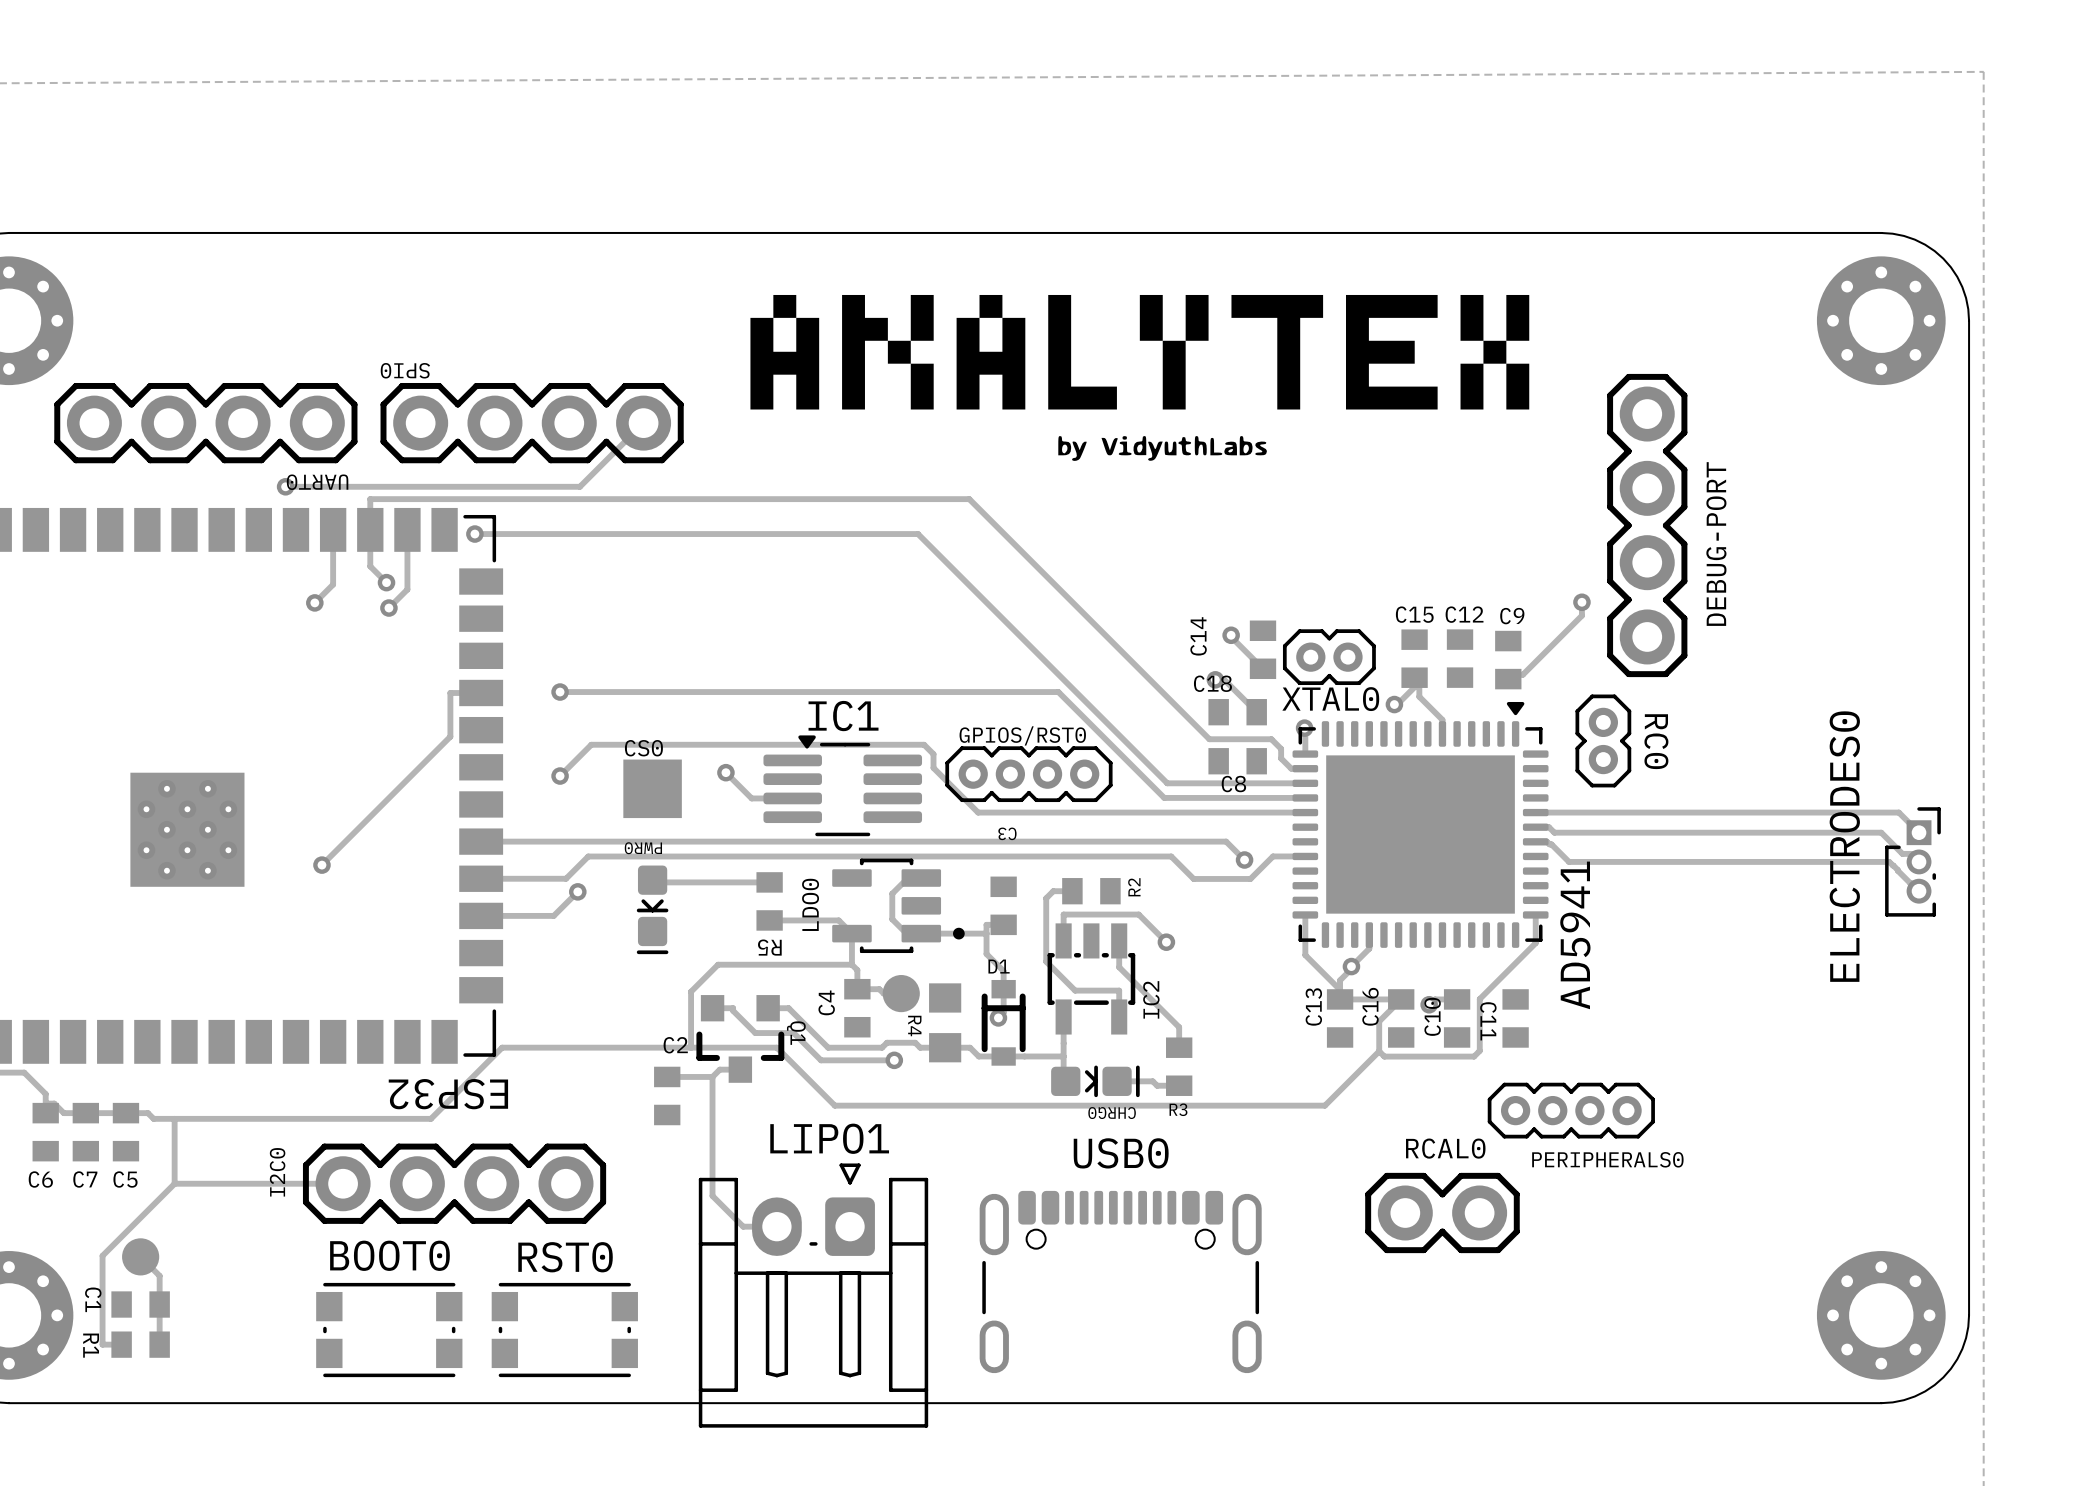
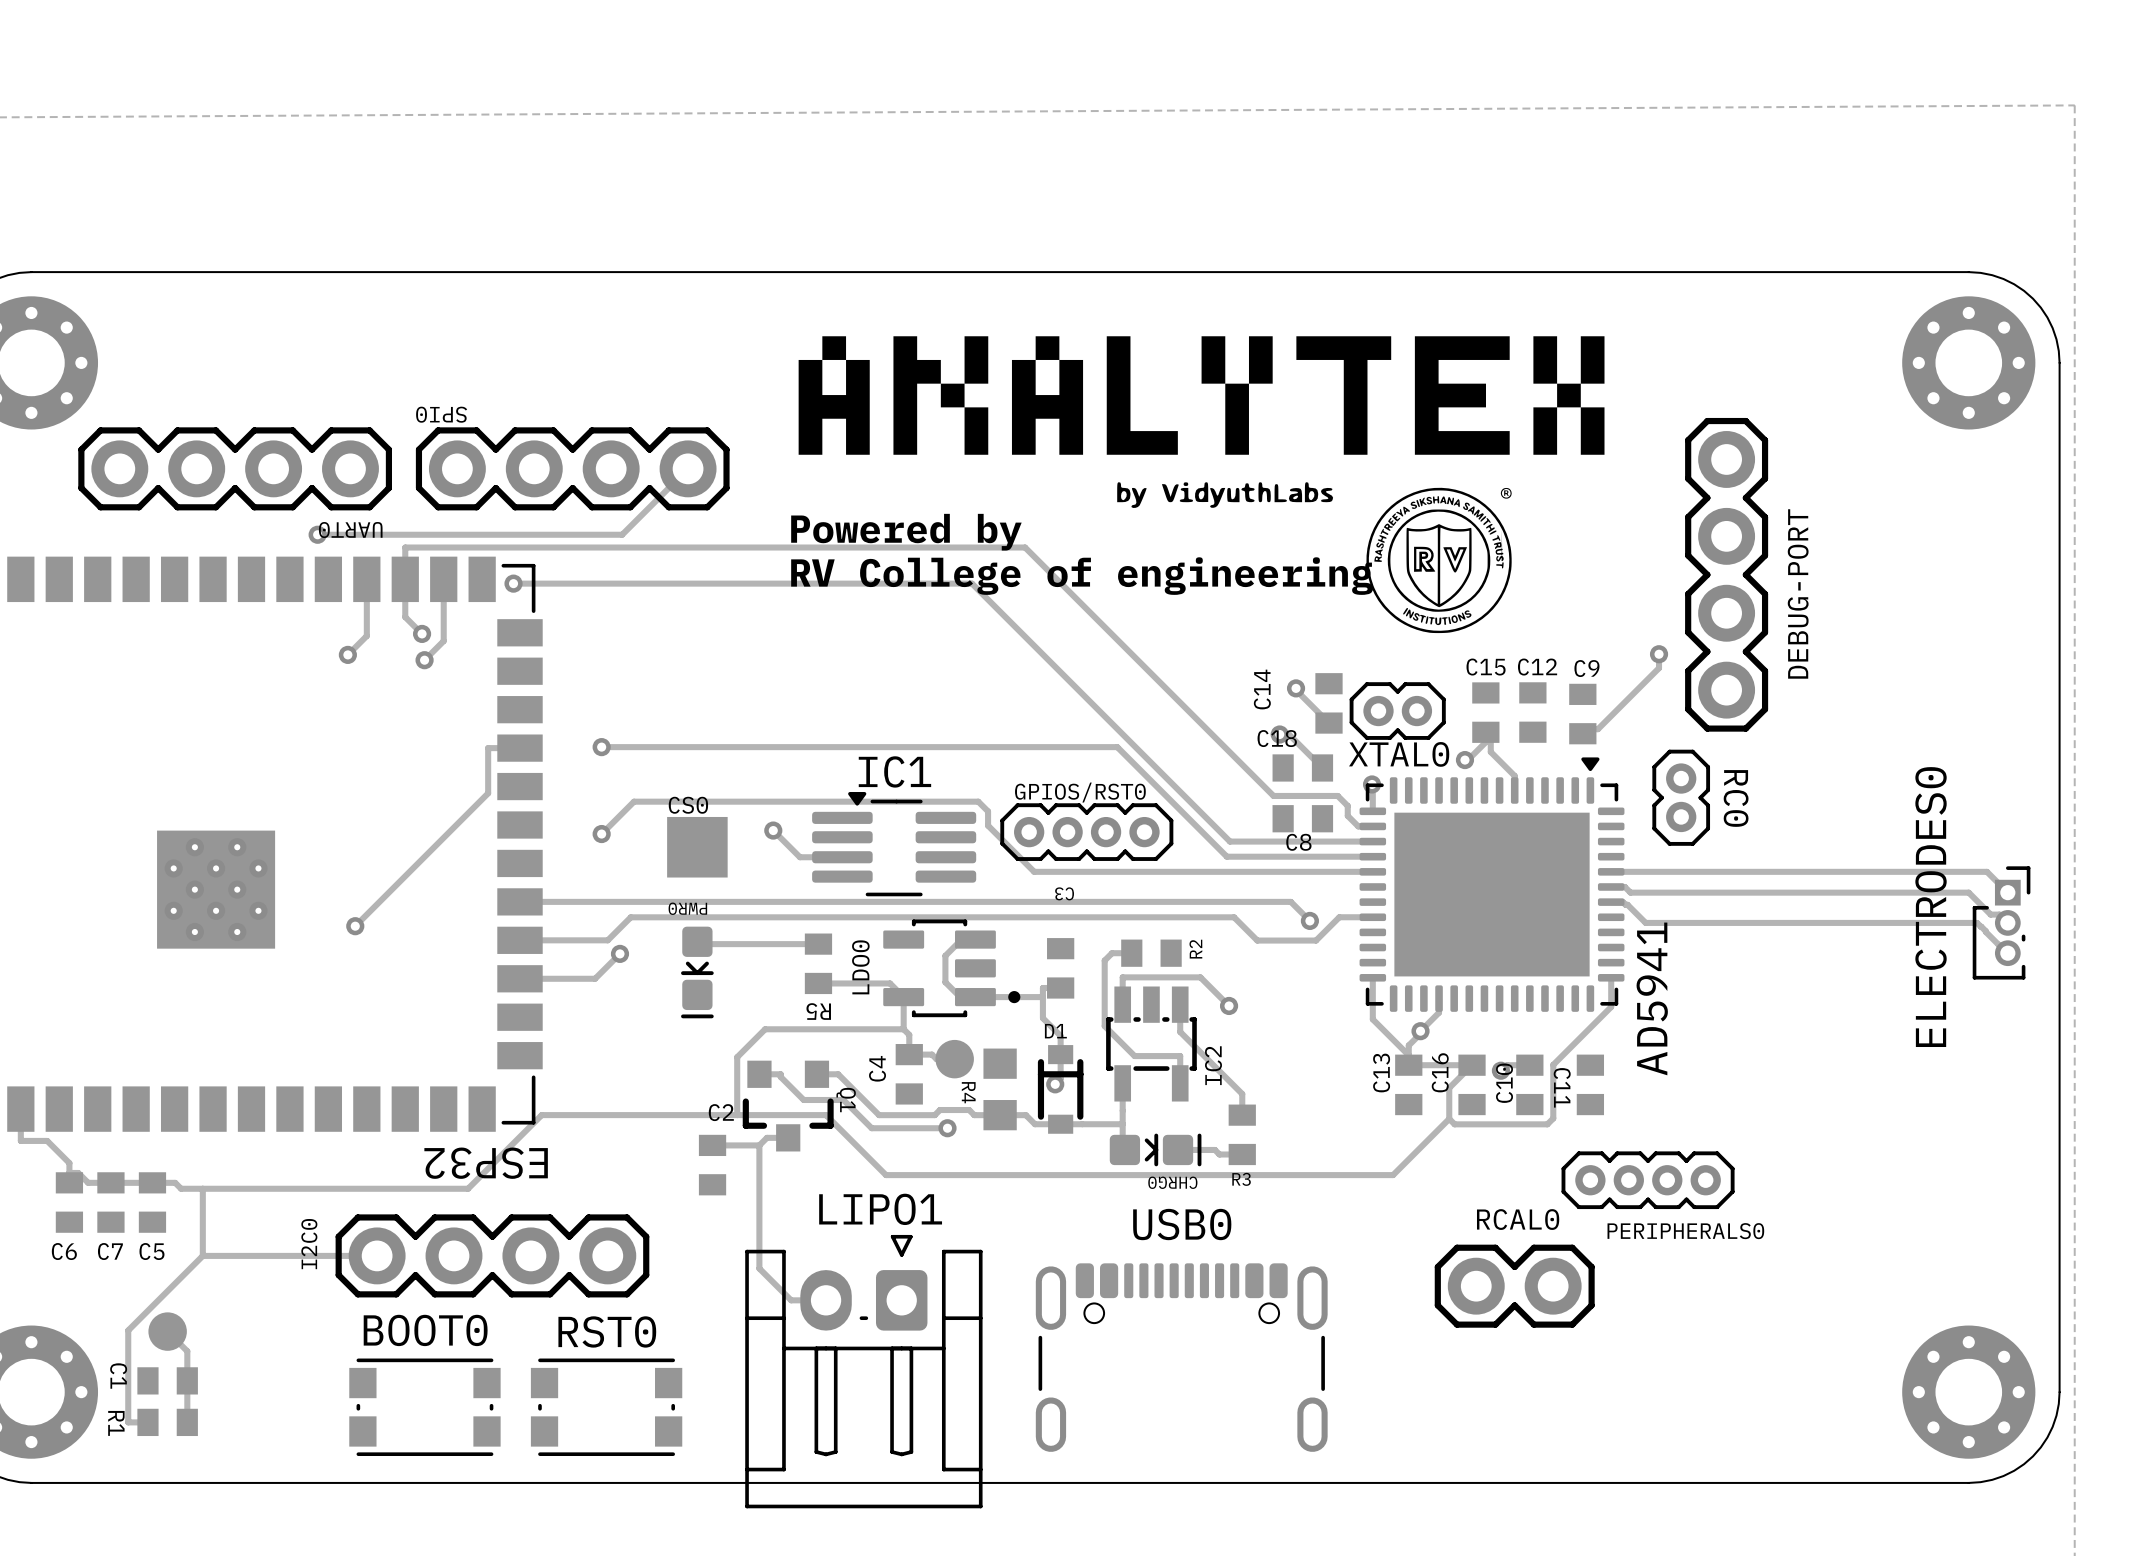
drawing: none -> [1366, 487, 1512, 634]
text: none -> Powered by (906, 532)
text: none -> RV College of engineering (1082, 576)

